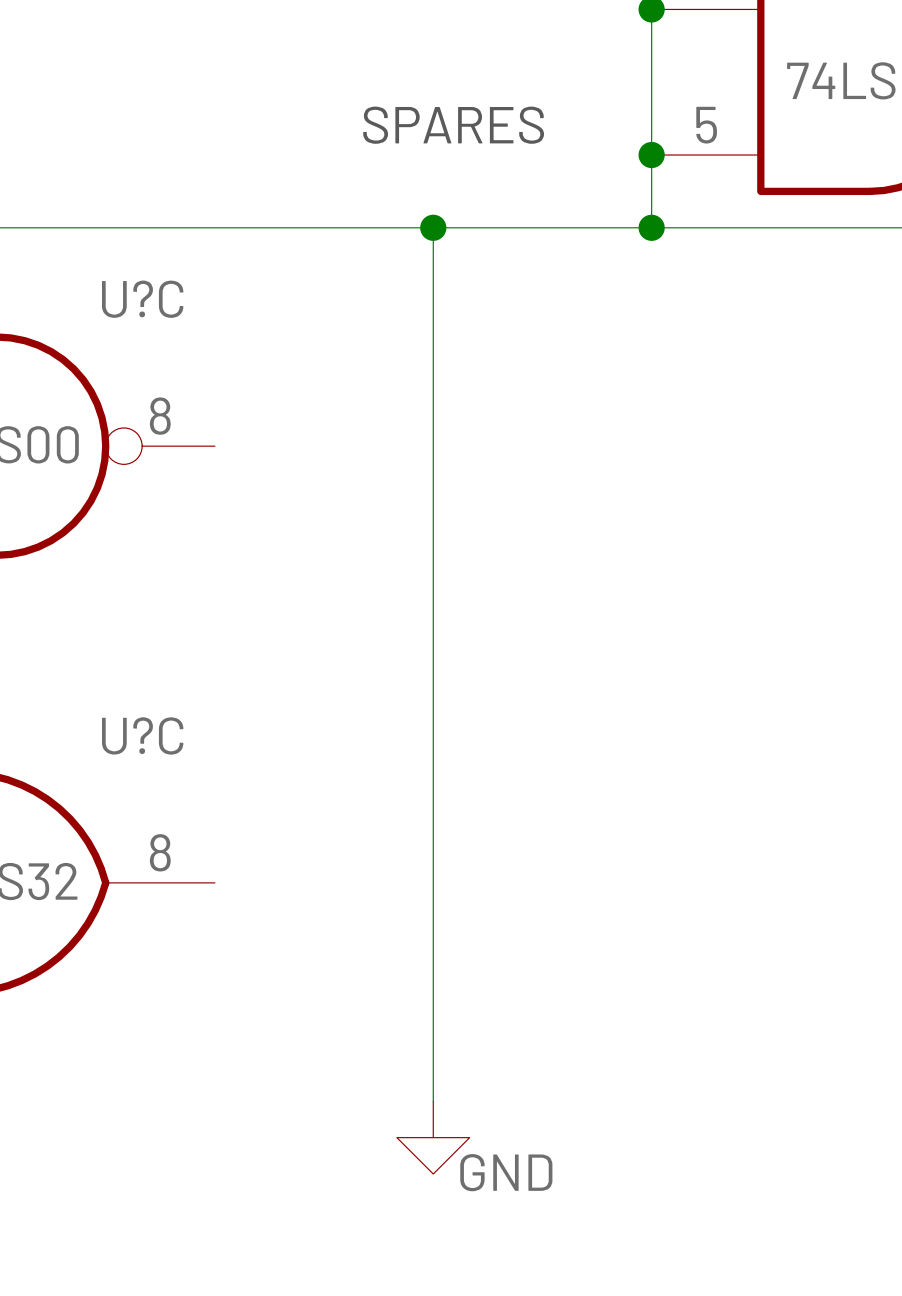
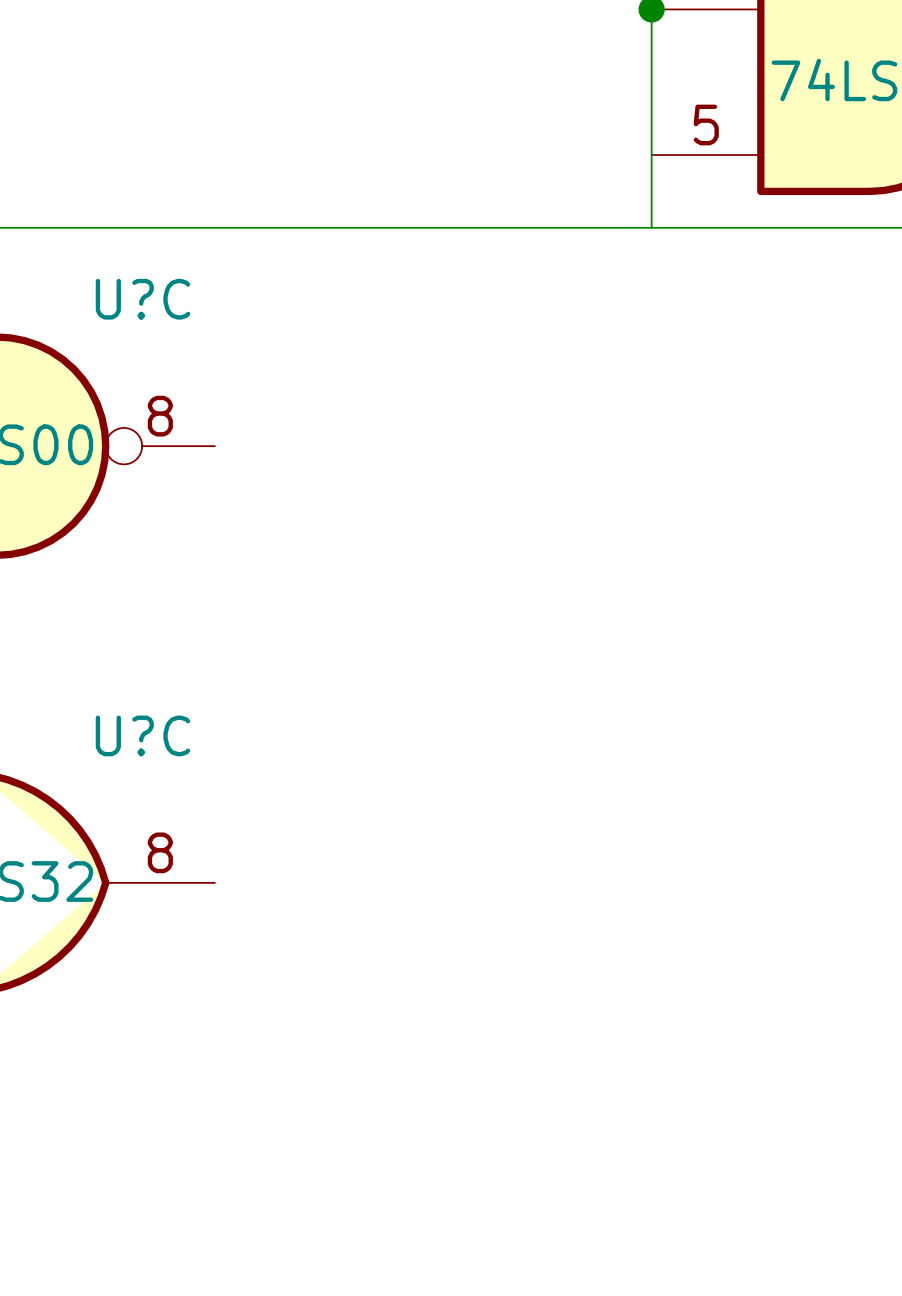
text: SPARES (453, 125) -> none
junction: (651, 155) -> none
wire: (433, 227) (433, 1101) -> none
junction: (433, 227) -> none
junction: (651, 227) -> none
power symbol: GND (433, 1137) -> none

